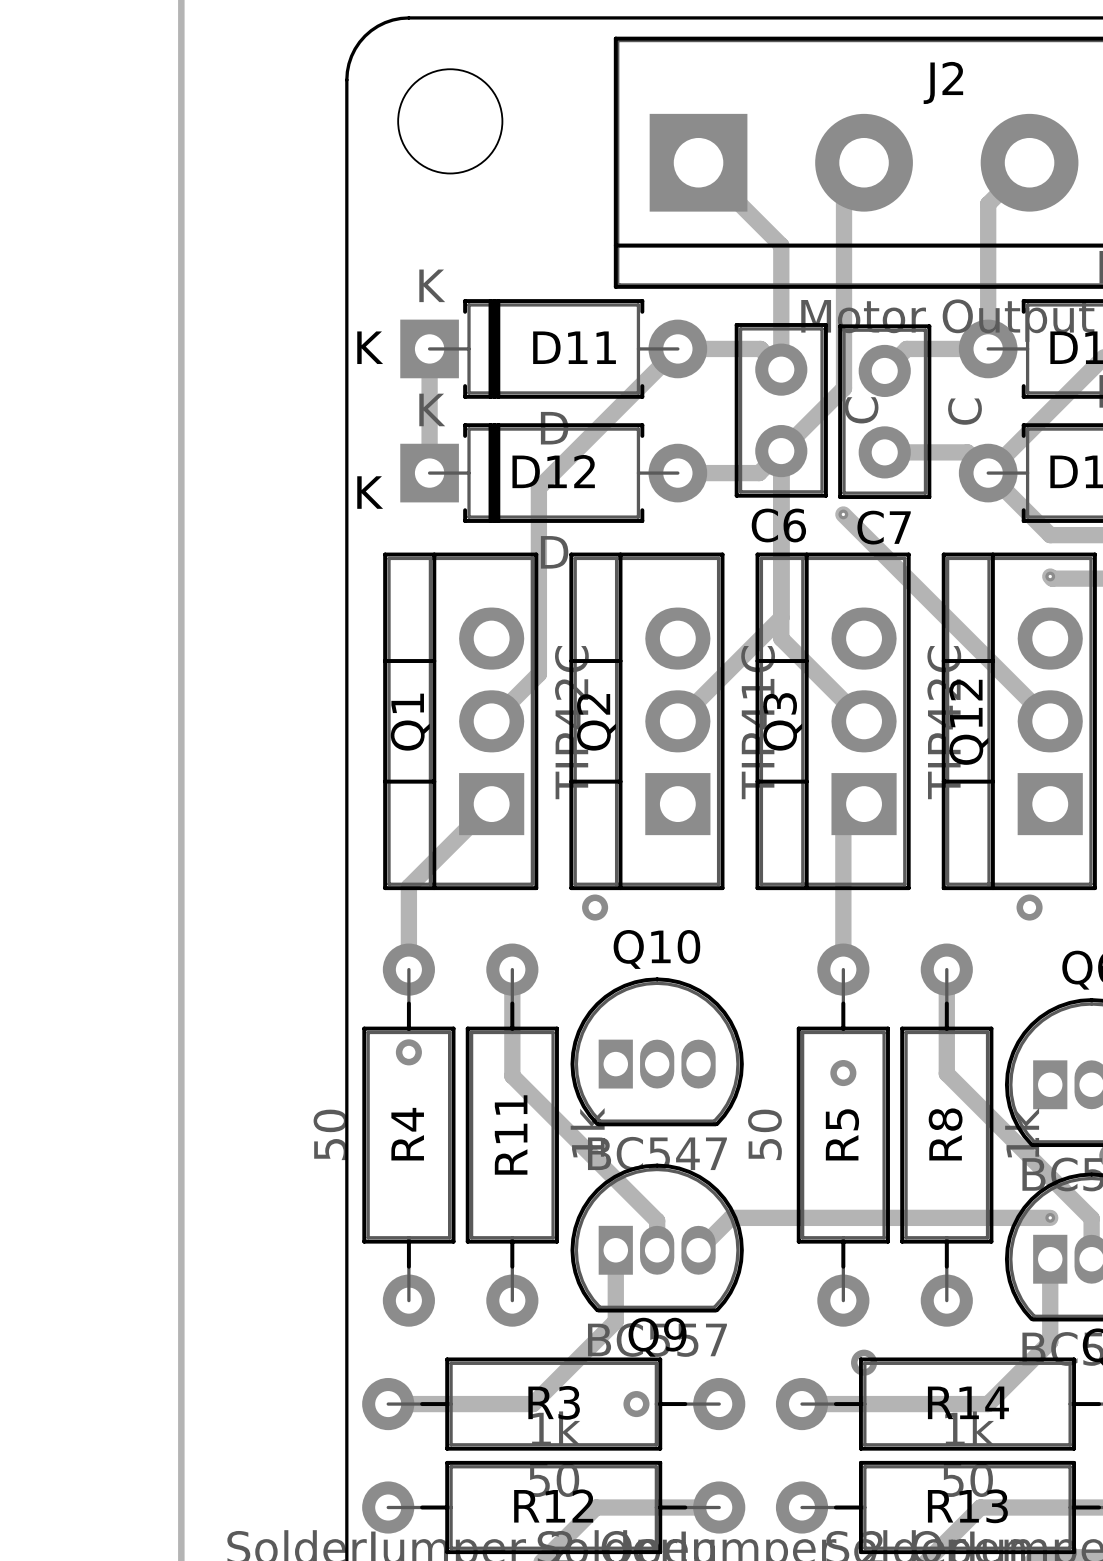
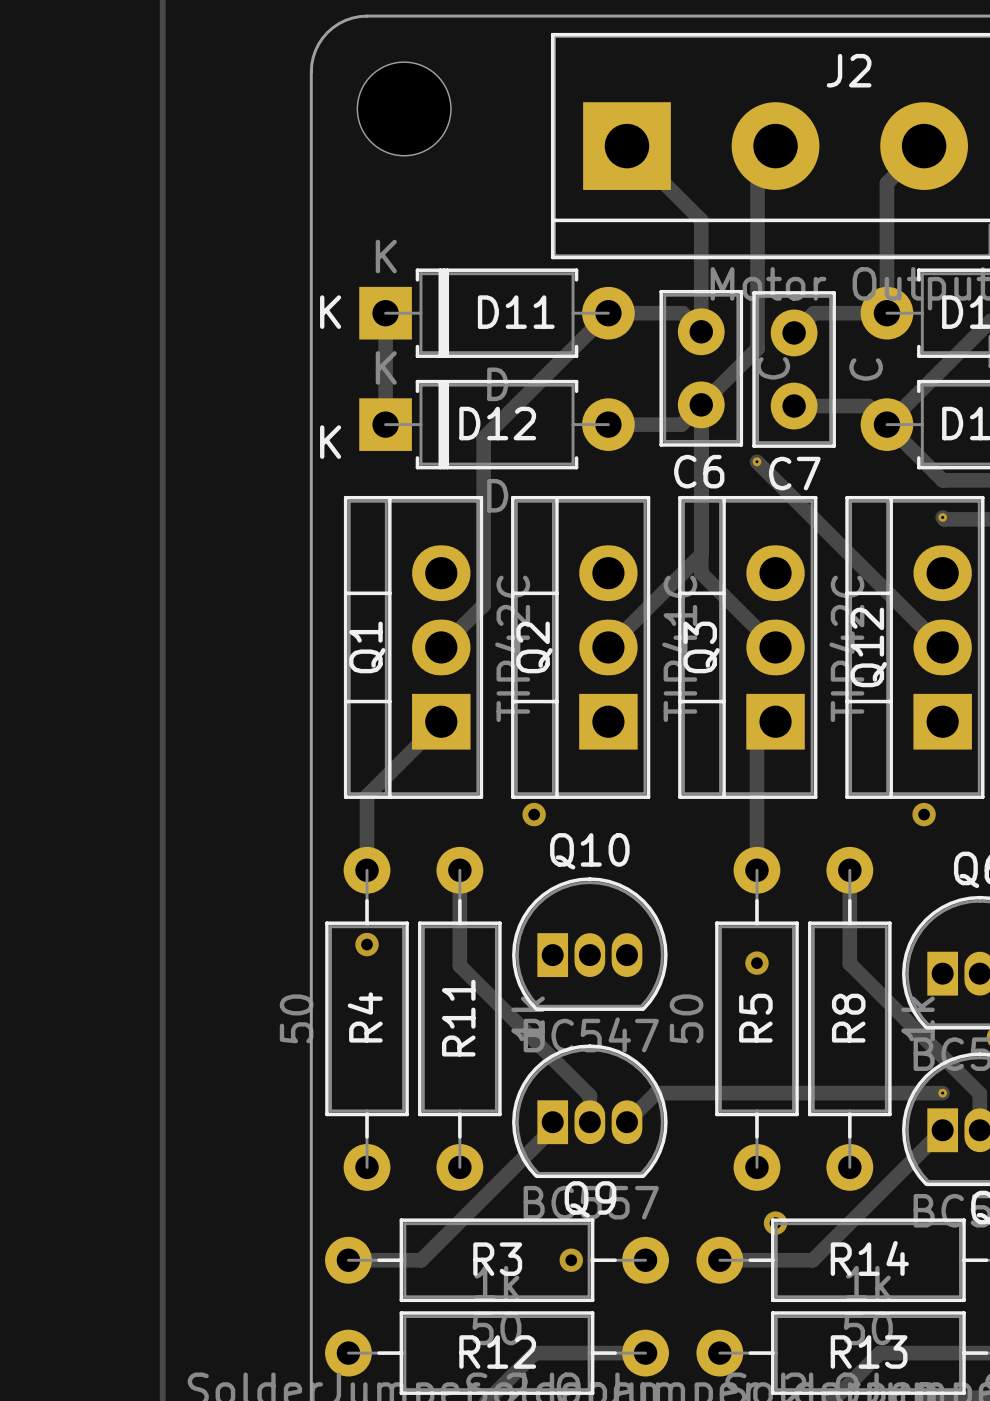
track: (615, 1257) (615, 1321) (533, 1404) (469, 1404) -> (552, 1128) (421, 1260)
track: (1050, 1259) (1050, 1342) (988, 1404) (905, 1404) -> (942, 1130) (812, 1260)

